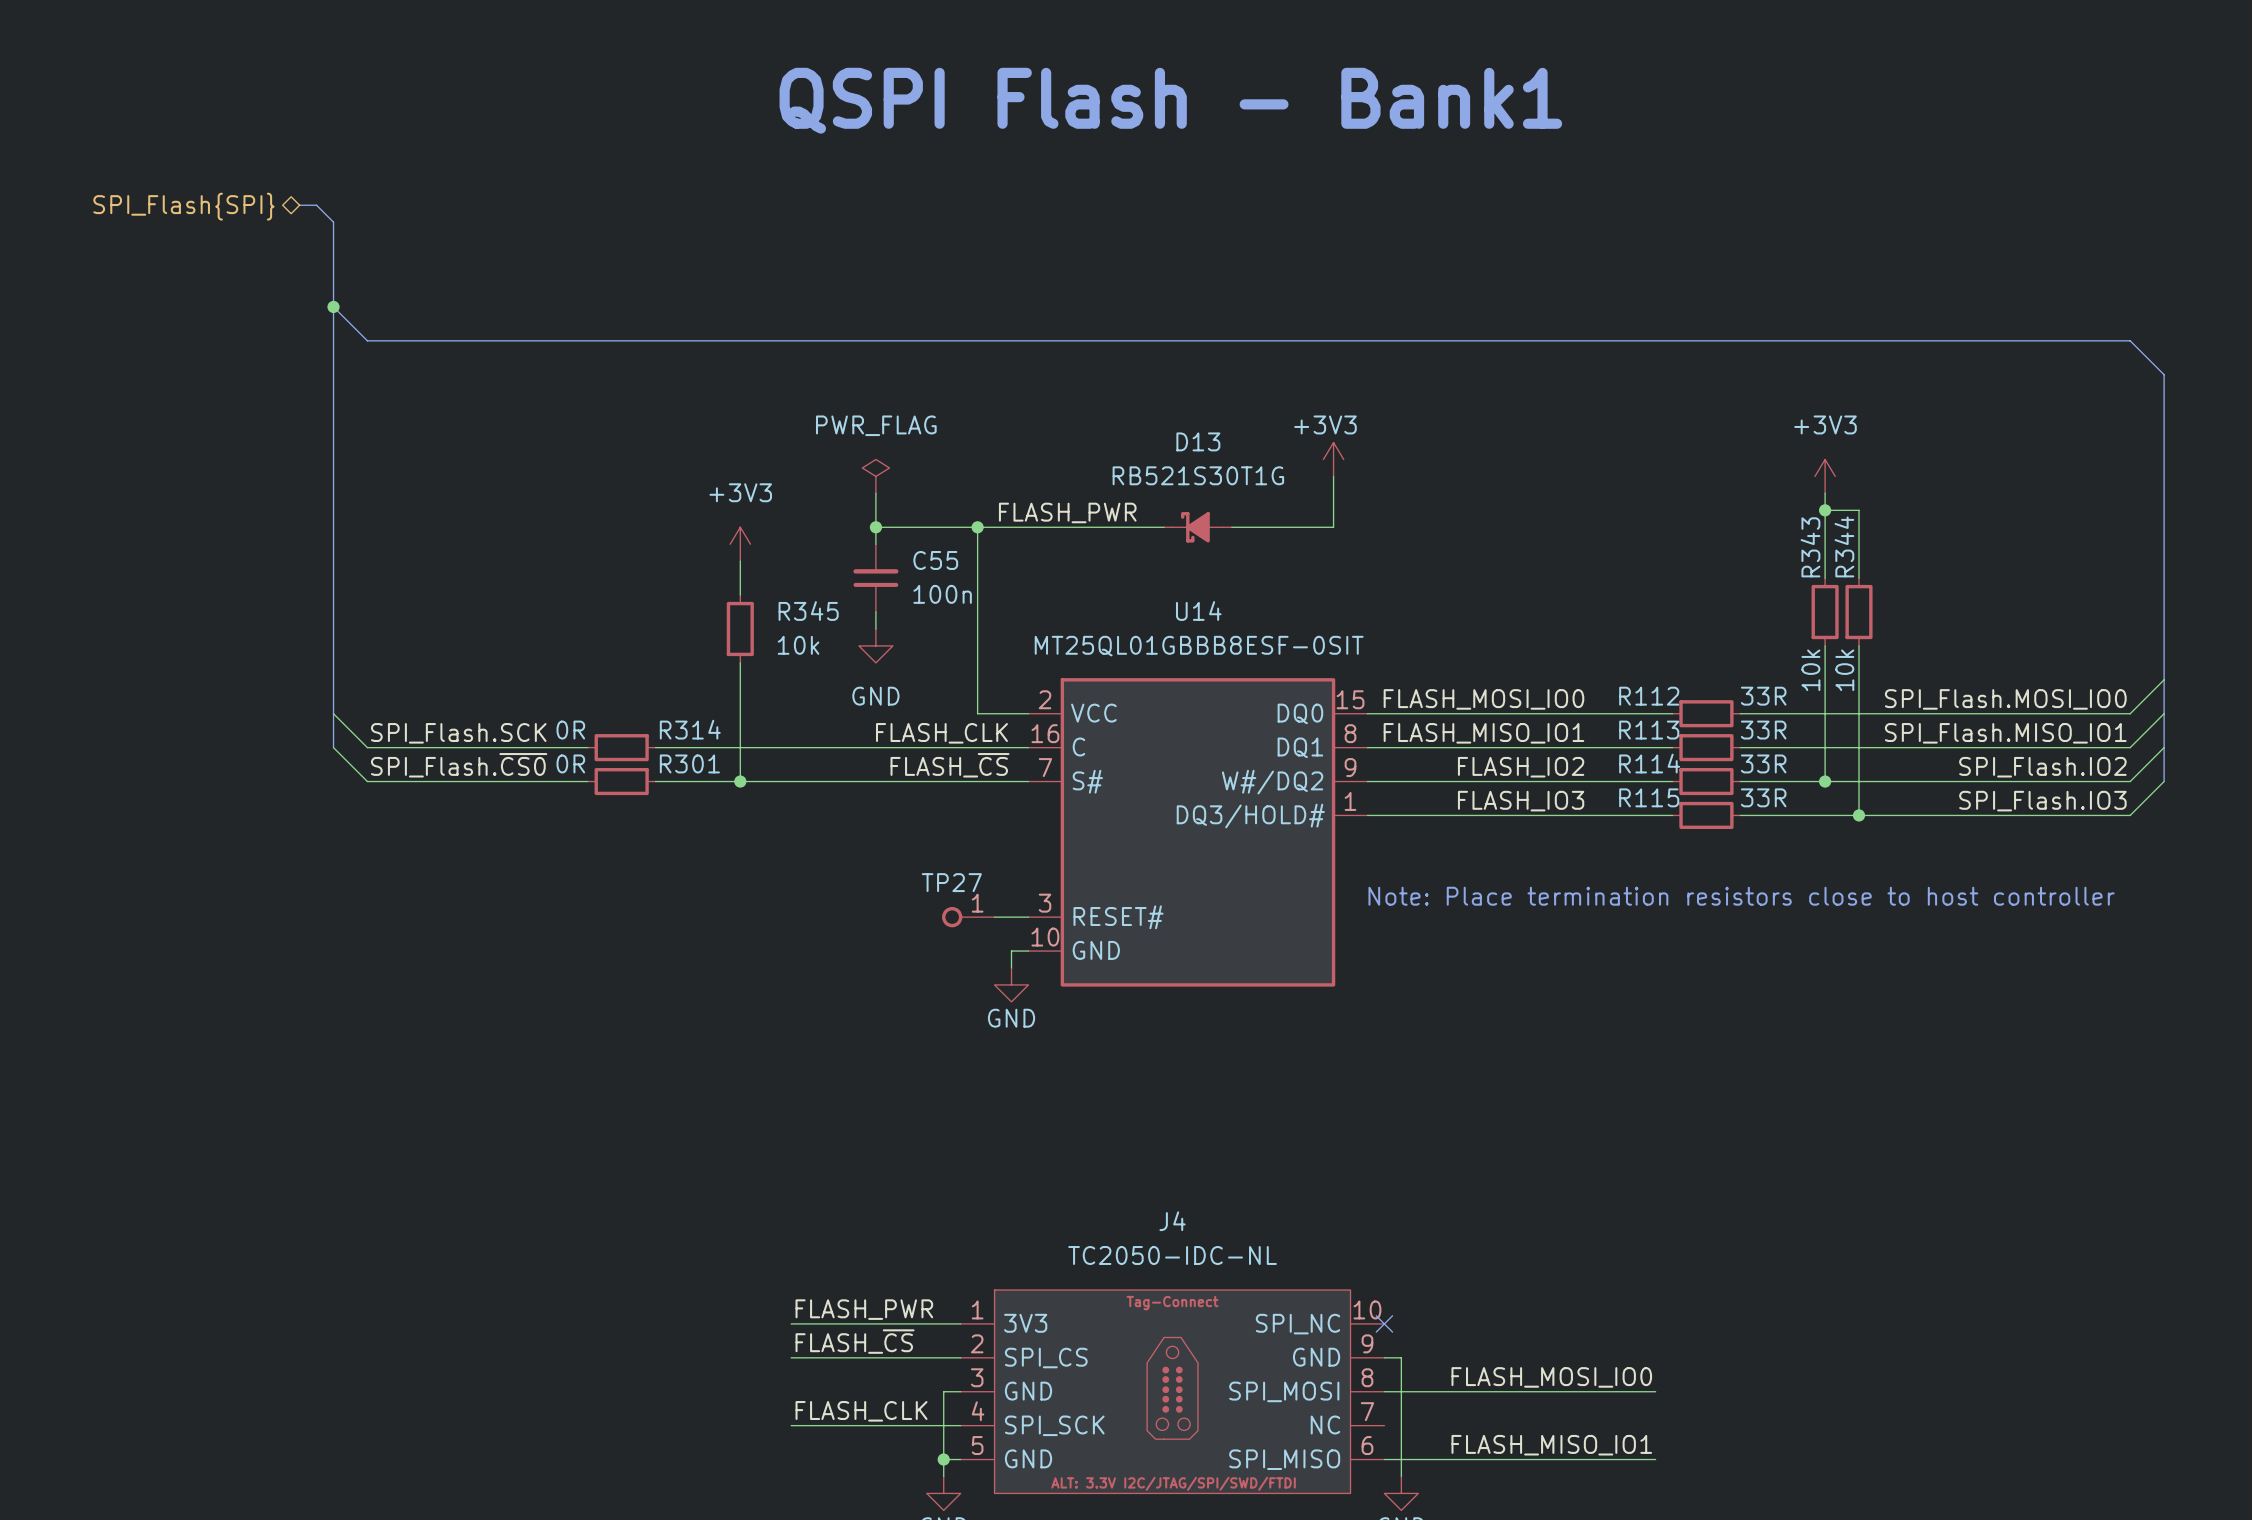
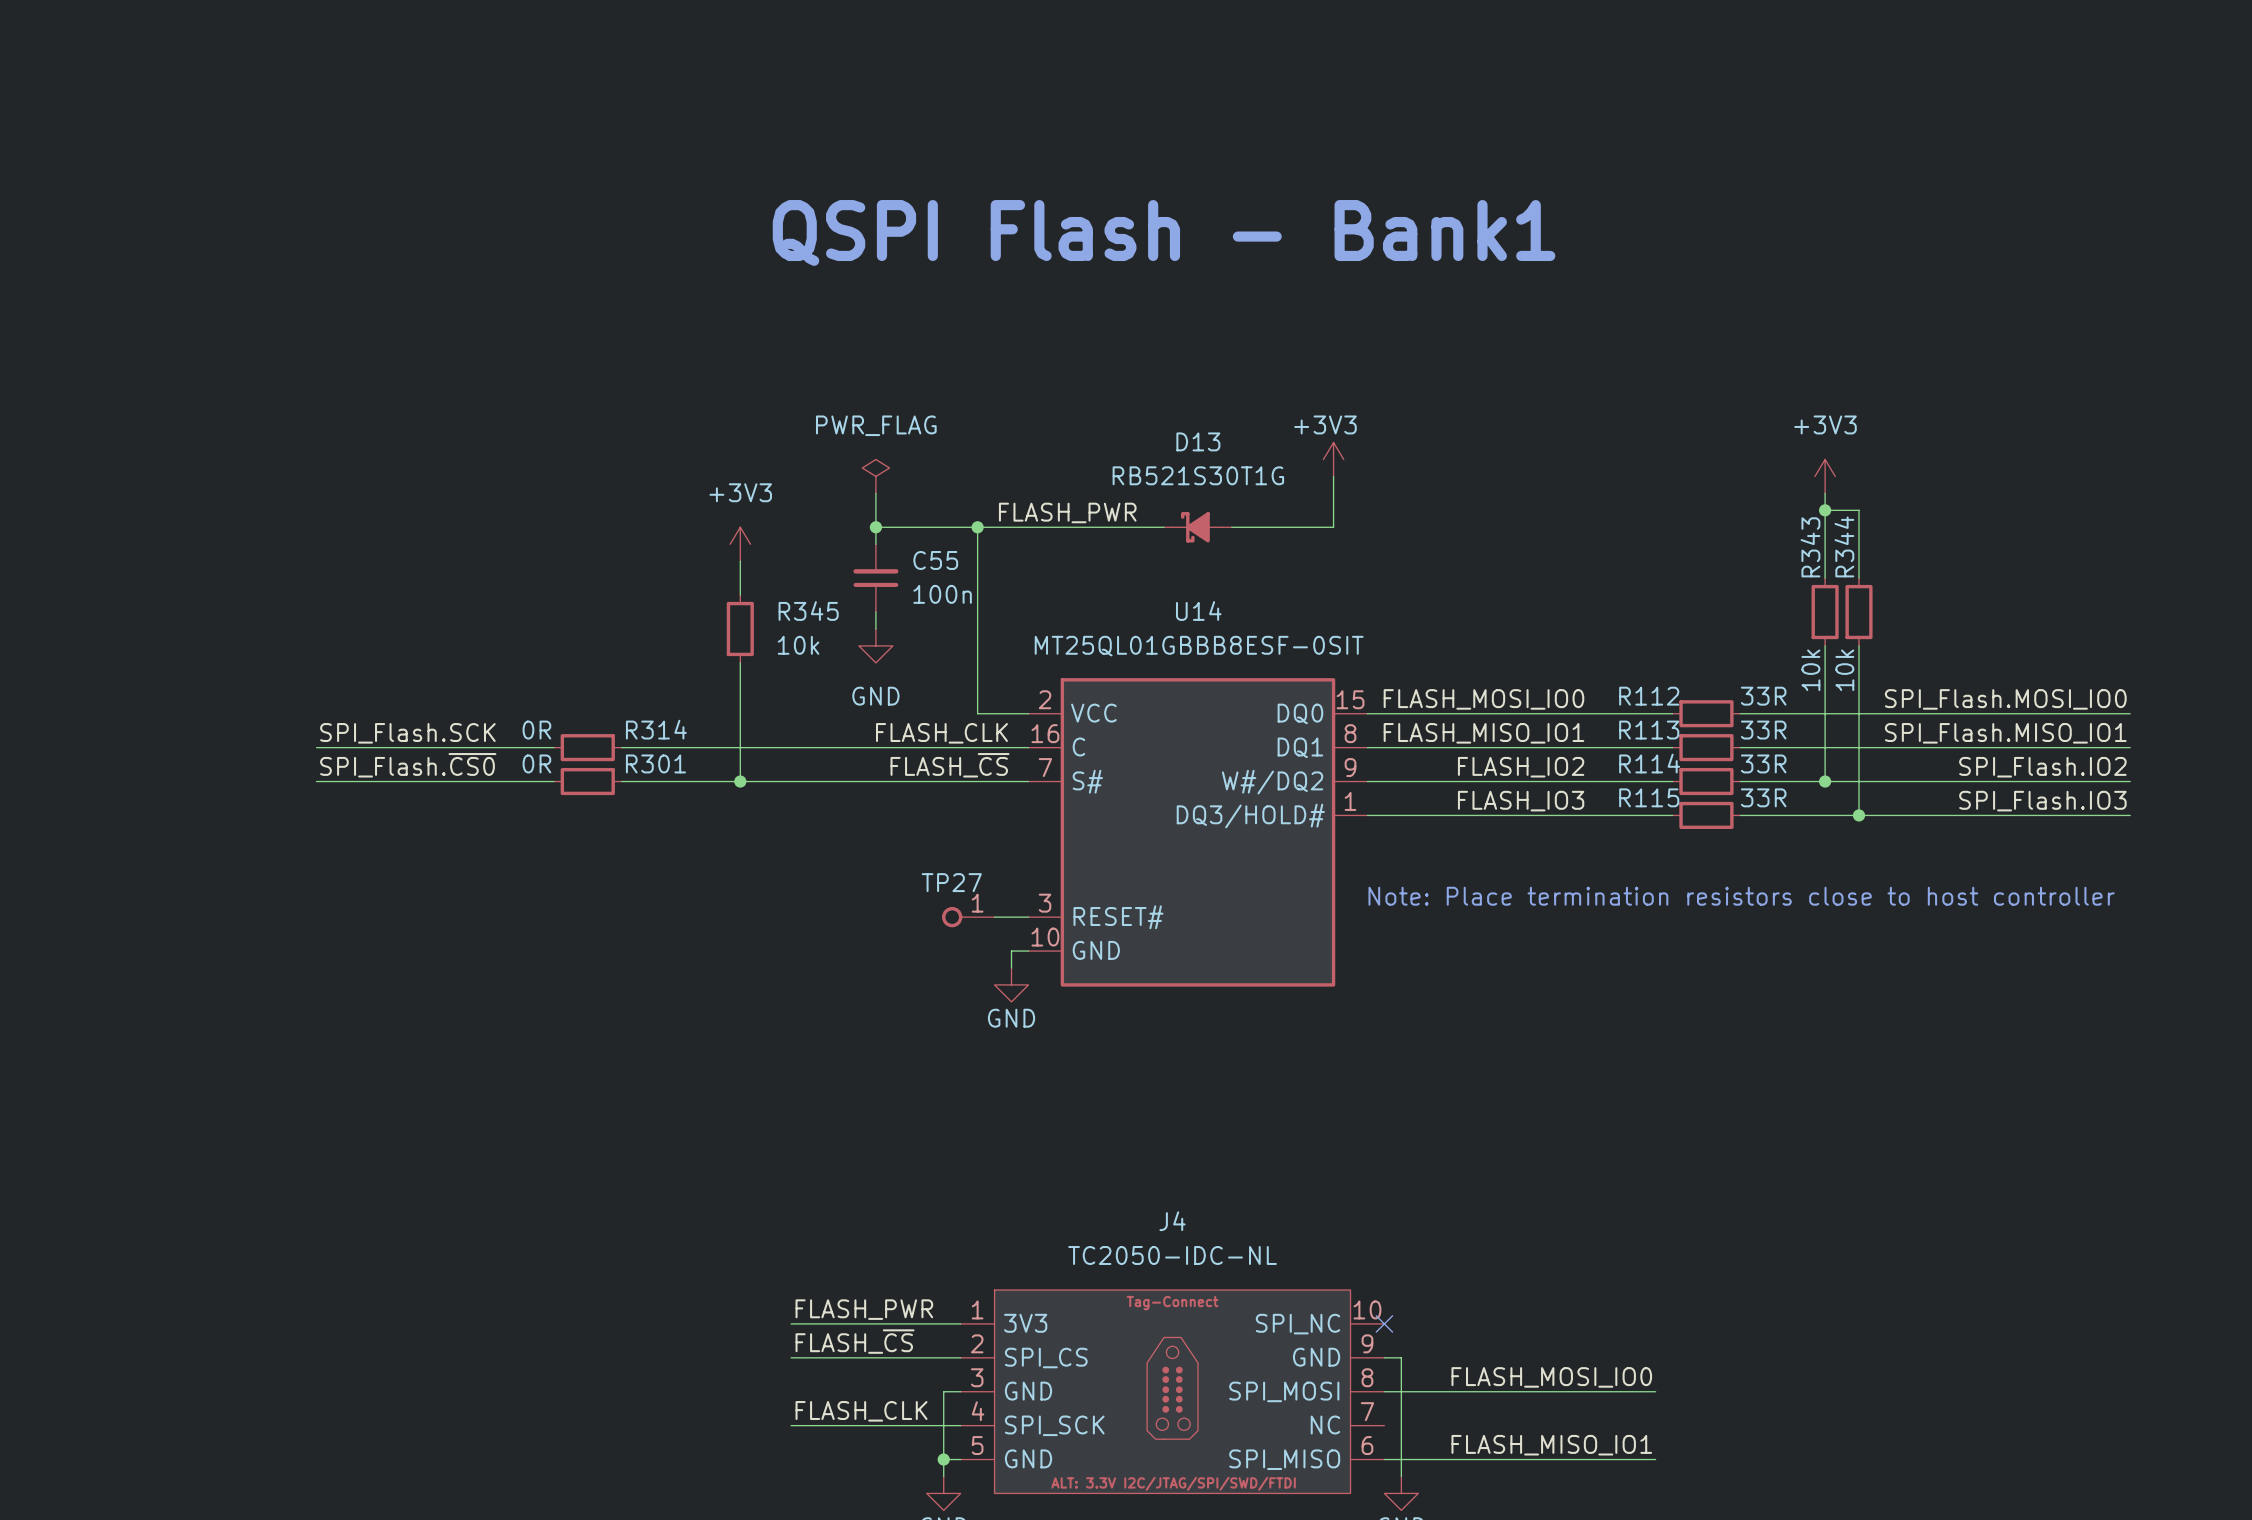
text position: QSPI Flash - Bank1 (1170, 100) -> QSPI Flash - Bank1 (1164, 232)
bus: (299, 205) (316, 205) (333, 222) (333, 747) -> none
hierarchical label: SPI_Flash{SPI} (183, 206) -> none
bus: (333, 306) (367, 340) (2130, 340) (2164, 374) (2164, 781) -> none
junction: (333, 306) -> none
wire: (2164, 679) (2130, 713) -> none
wire: (333, 713) (367, 747) -> (316, 747) (367, 747)
wire: (2164, 713) (2130, 747) -> none
label position: SPI_Flash.SCK (458, 733) -> SPI_Flash.SCK (407, 733)
wire: (333, 747) (367, 781) -> (316, 781) (367, 781)
wire: (553, 747) (587, 747) -> (621, 747) (655, 747)
R314 position: (621, 747) -> (587, 747)
wire: (2164, 747) (2130, 781) -> none
label position: SPI_Flash.~{CS0} (459, 765) -> SPI_Flash.~{CS0} (408, 765)
wire: (553, 781) (587, 781) -> (621, 781) (655, 781)
R301 position: (621, 781) -> (587, 781)
wire: (2164, 781) (2130, 815) -> none

